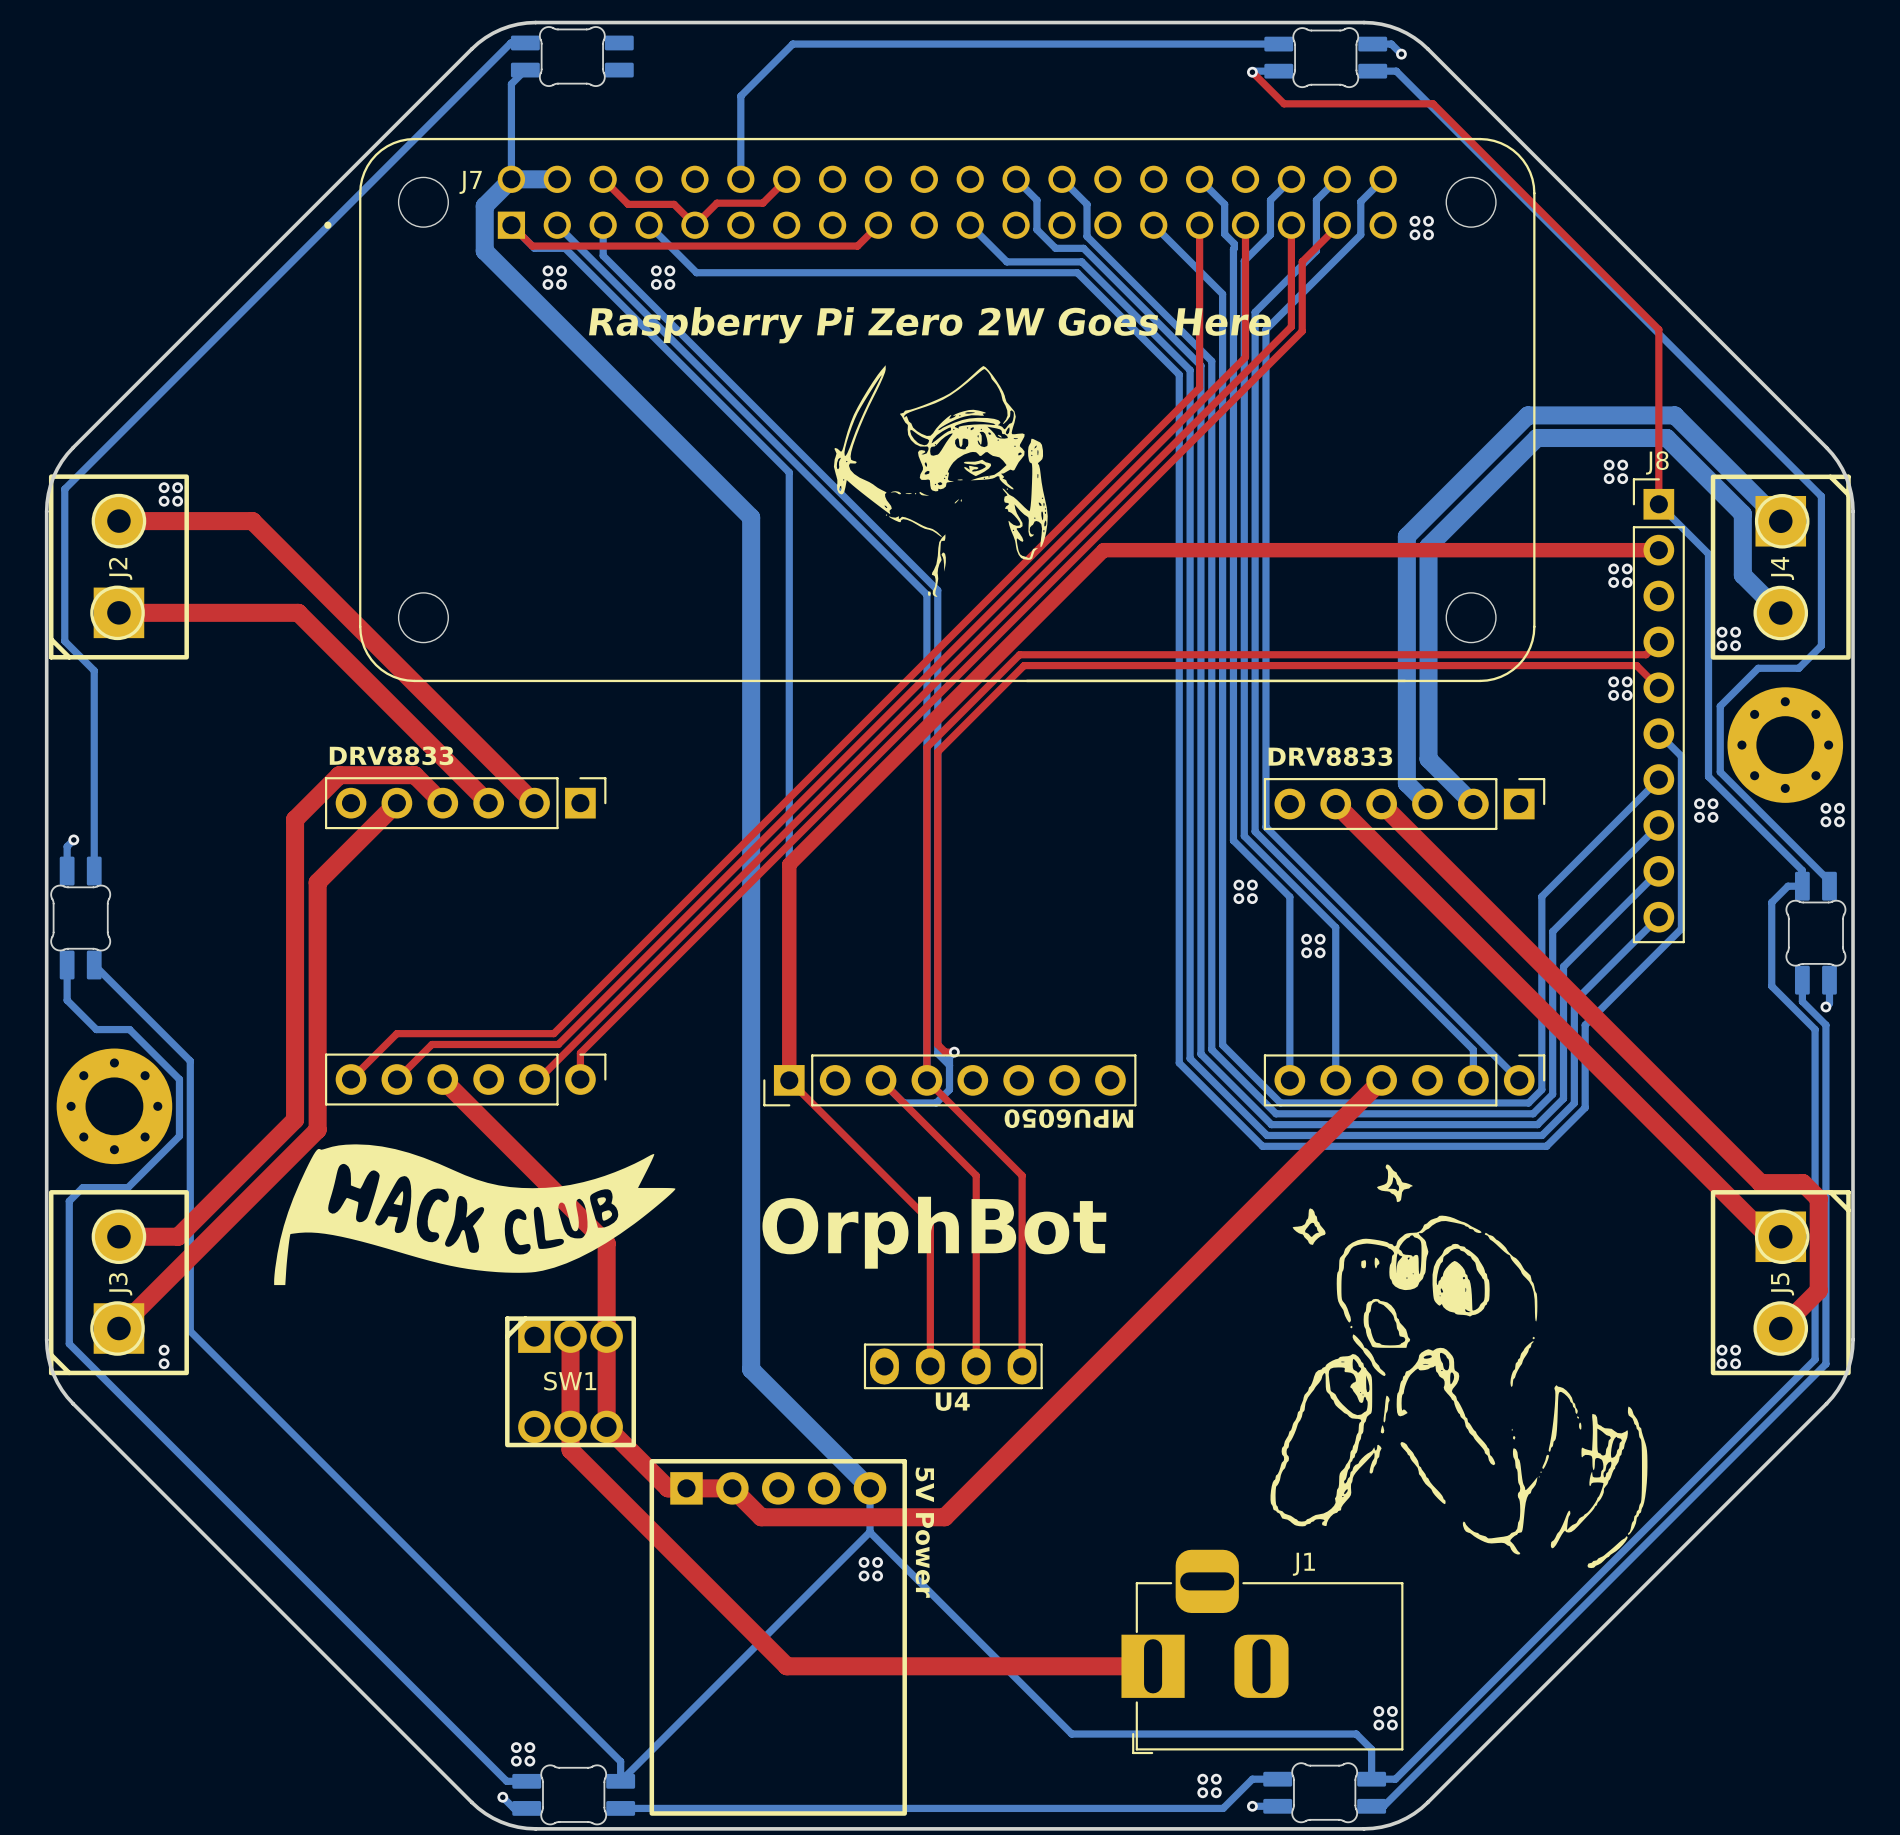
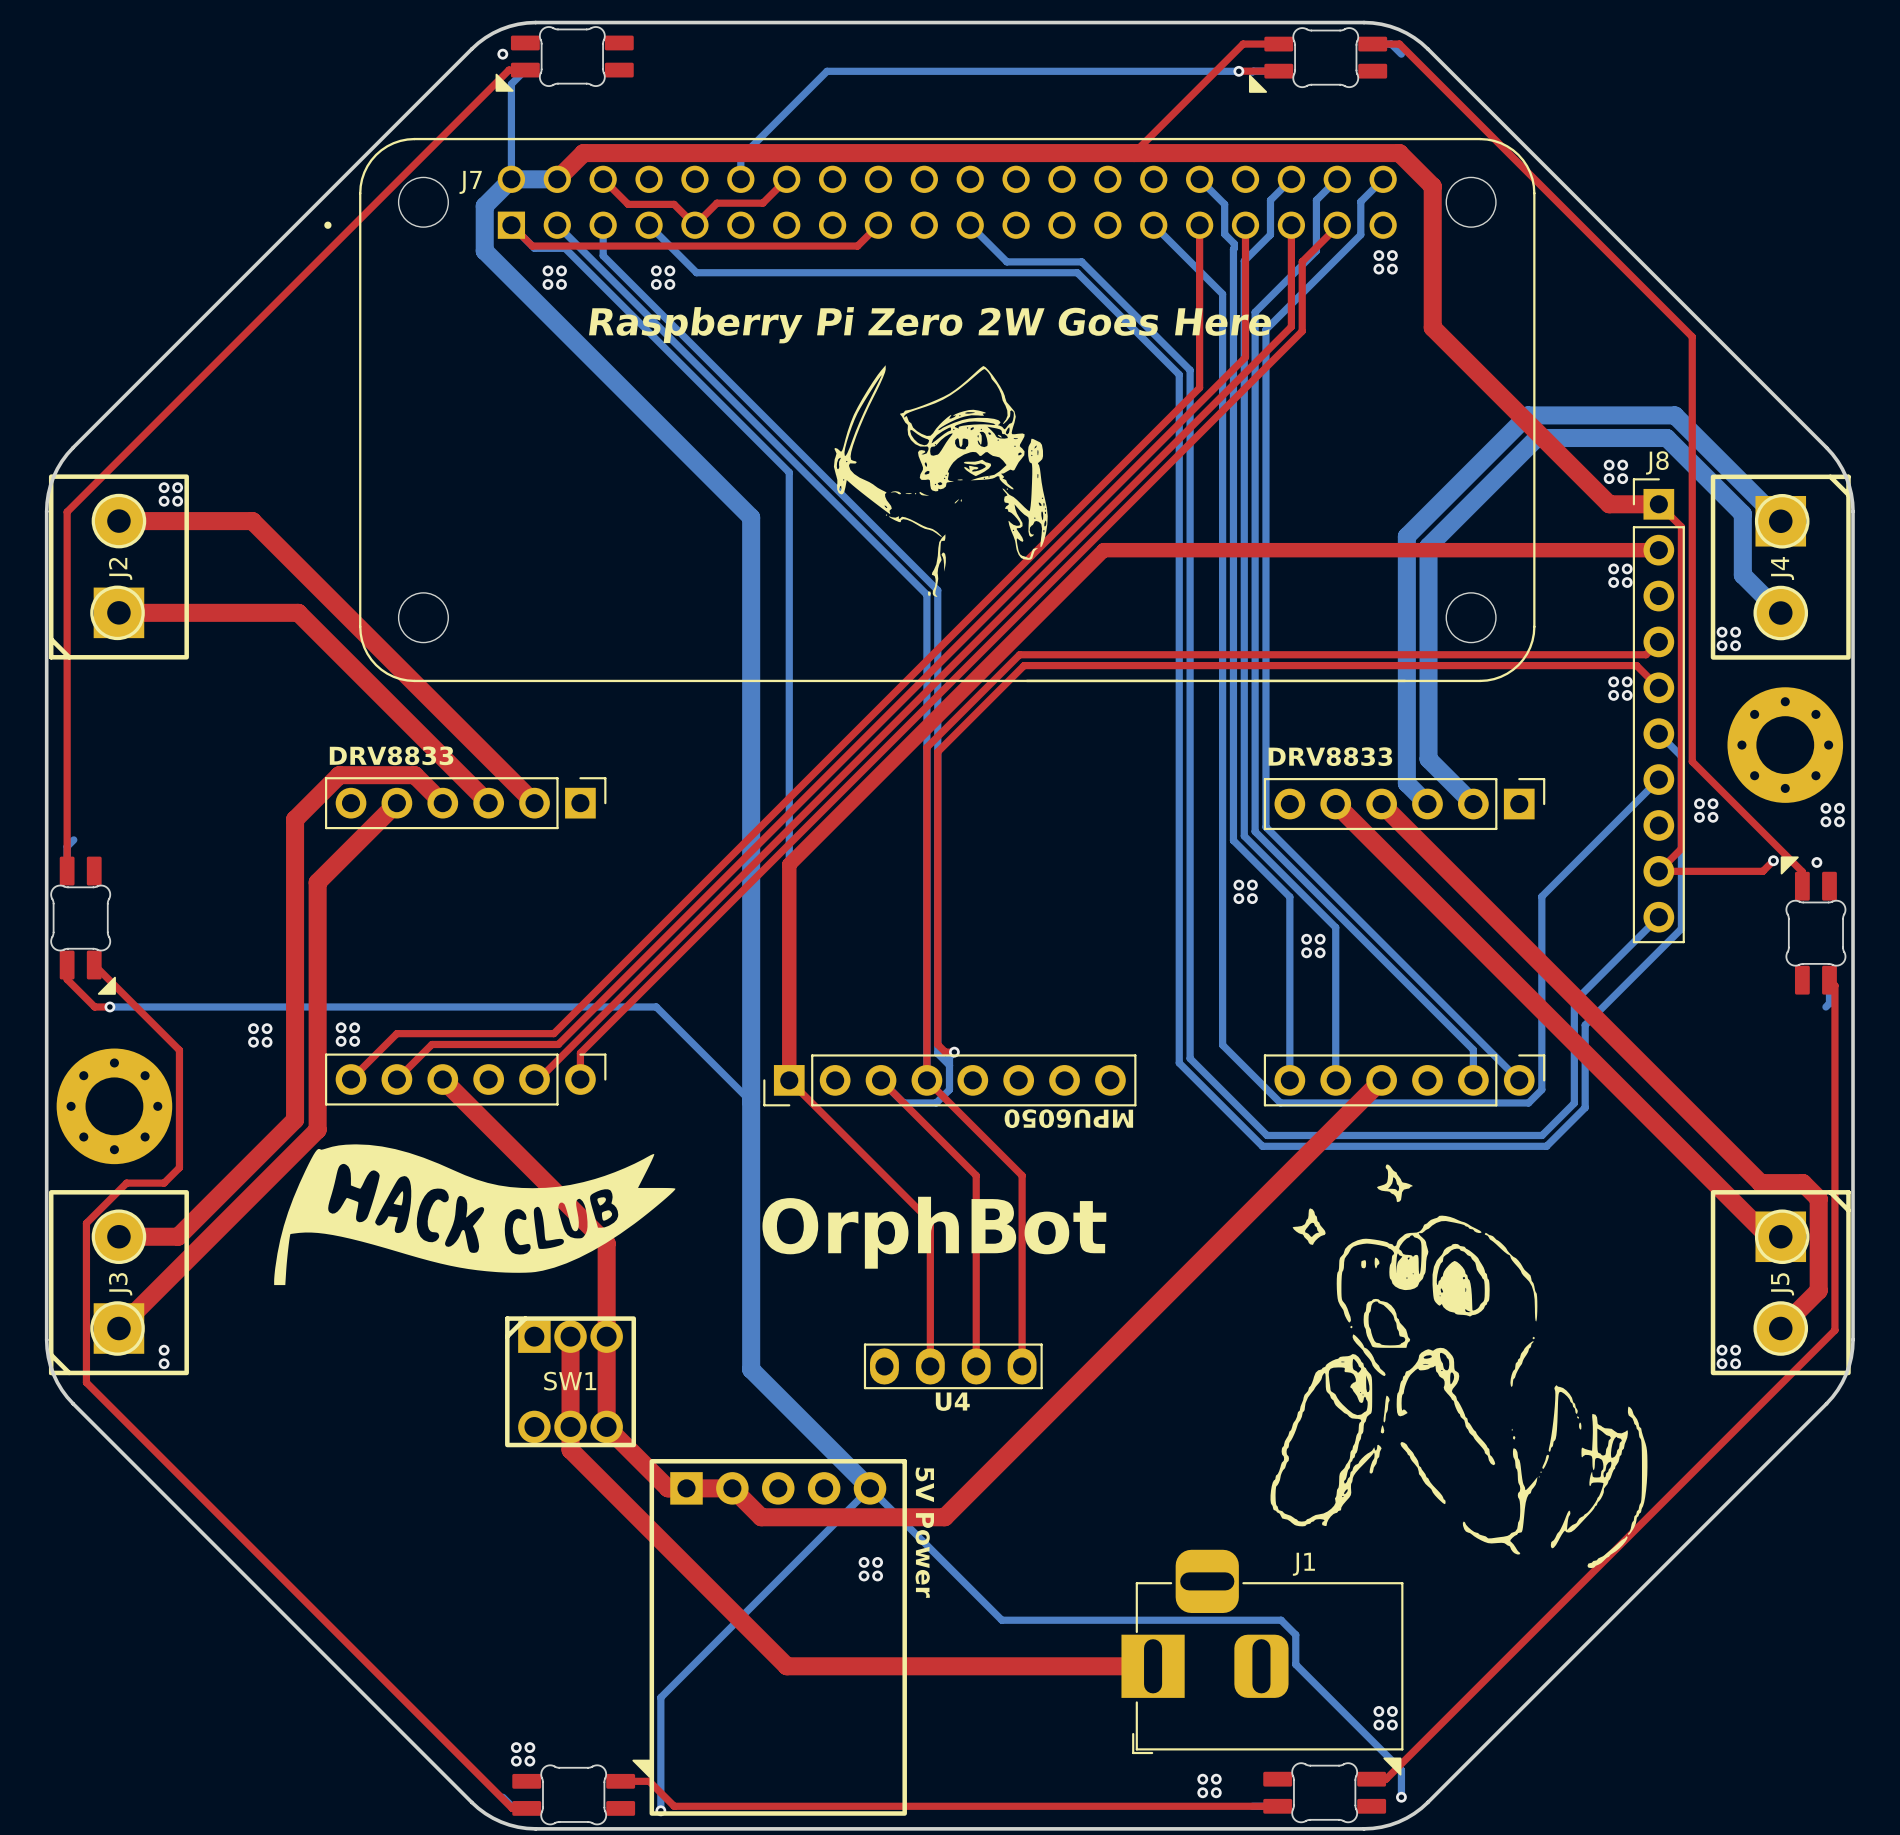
bottom track: (525, 42) (510, 42) (64, 489) (64, 641) (94, 670) (94, 871) -> none
top track: none -> (1278, 44) (1243, 44) (1134, 153)
bottom track: (1278, 44) (792, 44) (740, 96) (740, 157) -> (1238, 71) (827, 71) (740, 157)
top track: none -> (1372, 44) (1399, 44) (1692, 336) (1692, 761) (1802, 871) (1802, 886)
via: none -> (502, 54)
via: (1401, 54) -> none
part side: top (572, 56) -> bottom (564, 58)
part side: top (1325, 57) -> bottom (1318, 60)
top track: none -> (525, 70) (509, 70) (67, 511) (67, 871)
top track: none -> (1239, 71) (1278, 71)
bottom track: (1372, 71) (1396, 71) (1821, 496) (1821, 645) (1798, 668) (1758, 668) (1720, 706) (1720, 772) (1829, 881) (1829, 886) -> none
top track: (1252, 72) (1284, 103) (1433, 103) (1658, 329) (1658, 504) -> none
via position: (1252, 72) -> (1238, 71)
top track: none -> (557, 179) (583, 153) (1399, 153) (1432, 186) (1432, 327) (1609, 504) (1658, 504) (1681, 526) (1681, 848) (1658, 871) (1762, 871) (1773, 860)
bottom track: (1016, 179) (1036, 200) (1036, 229) (1055, 248) (1083, 248) (1200, 365) (1200, 1054) (1271, 1124) (1537, 1124) (1563, 1098) (1563, 966) (1658, 871) -> none
bottom track: (1061, 179) (1087, 204) (1087, 236) (1211, 361) (1211, 1049) (1276, 1113) (1533, 1113) (1552, 1094) (1552, 931) (1658, 825) -> none
via: (1414, 221) -> none
via: (1428, 221) -> none
via: (1414, 234) -> none
via: (1428, 234) -> none
via: none -> (1378, 255)
via: none -> (1392, 255)
via: none -> (1378, 269)
via: none -> (1392, 269)
bottom track: (1658, 504) (1708, 553) (1708, 776) (1802, 870) (1802, 886) (1788, 886) (1771, 902) (1771, 986) (1815, 1029) (1815, 1359) (1395, 1779) (1371, 1779) (1371, 1749) (1356, 1734) (1071, 1734) (870, 1532) (870, 1488) -> none
via: (73, 839) -> none
via: none -> (1773, 860)
via: none -> (1816, 862)
part side: top (80, 918) -> bottom (83, 925)
part side: top (1815, 933) -> bottom (1813, 925)
top track: none -> (67, 964) (67, 979) (94, 1006) (109, 1006)
bottom track: (67, 964) (67, 1000) (96, 1029) (129, 1029) (179, 1079) (179, 1136) (127, 1187) (82, 1187) (69, 1201) (69, 1343) (506, 1781) (526, 1781) -> none
top track: none -> (94, 964) (179, 1050) (179, 1167) (164, 1183) (126, 1183) (86, 1223) (86, 1382) (512, 1808) (526, 1808)
bottom track: (94, 964) (190, 1061) (190, 1331) (620, 1761) (620, 1781) (870, 1531) -> none
bottom track: (1802, 980) (1802, 1001) (1825, 1025) (1825, 1364) (1383, 1806) (1371, 1806) -> none
top track: none -> (1829, 980) (1834, 985) (1834, 1330) (1386, 1779) (1371, 1779)
bottom track: none -> (109, 1006) (656, 1006) (751, 1101)
via: none -> (109, 1006)
via: (1825, 1006) -> none
via: none -> (341, 1027)
via: none -> (354, 1027)
via: none -> (253, 1028)
via: none -> (267, 1028)
via: none -> (341, 1041)
via: none -> (354, 1041)
via: none -> (253, 1042)
via: none -> (267, 1042)
bottom track: (1277, 1779) (1252, 1779) (1223, 1808) (620, 1808) -> none
top track: none -> (620, 1781) (649, 1781) (674, 1806) (1277, 1806)
part side: top (1324, 1792) -> bottom (1332, 1790)
part side: top (573, 1794) -> bottom (581, 1792)
via: (502, 1797) -> none
bottom track: none -> (1401, 1797) (1401, 1770) (1295, 1664) (1295, 1634) (1281, 1620) (1001, 1620) (870, 1488) (660, 1697) (660, 1810)
via: none -> (1401, 1797)
via: (1252, 1806) -> none
via: none -> (660, 1810)

